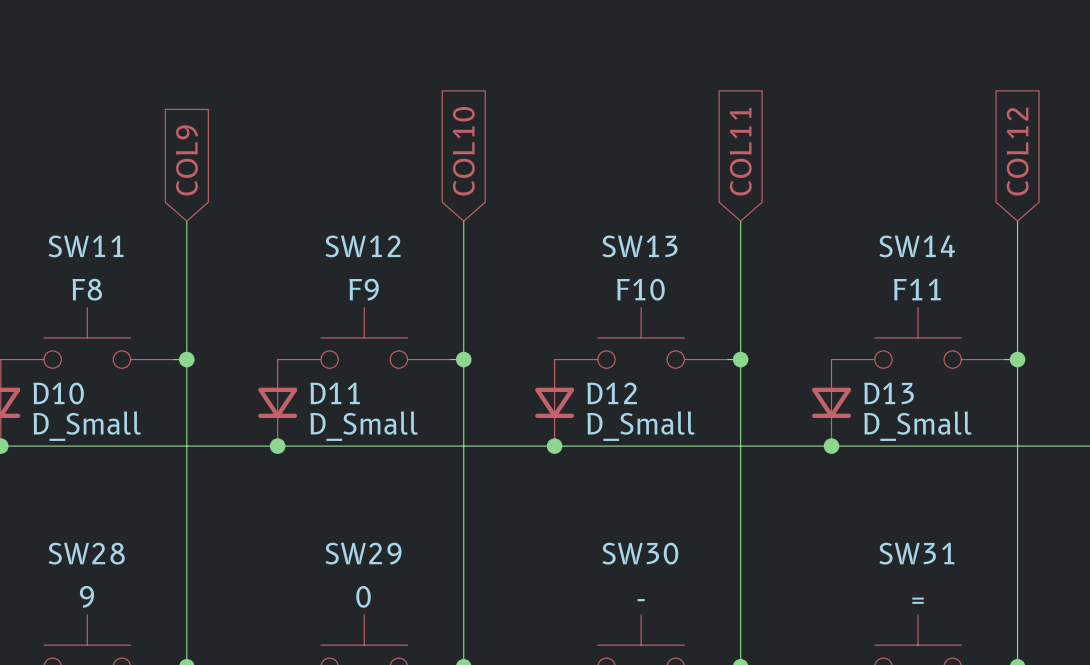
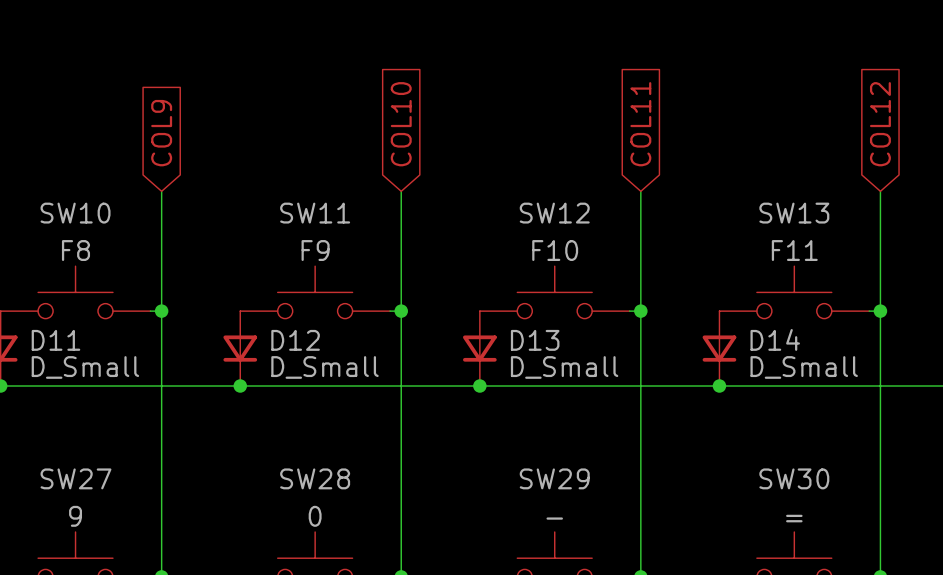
SW11 name: SW11 (86, 246) -> SW10 (75, 213)
SW12 name: SW12 (363, 246) -> SW11 (315, 213)
SW13 name: SW13 (639, 246) -> SW12 (554, 213)
SW14 name: SW14 (917, 246) -> SW13 (794, 213)
D10 name: D10 (58, 393) -> D11 (55, 340)
D11 name: D11 (335, 393) -> D12 (295, 340)
D12 name: D12 (612, 393) -> D13 (535, 340)
D13 name: D13 (889, 393) -> D14 (775, 339)
SW28 name: SW28 (86, 553) -> SW27 (75, 478)
SW29 name: SW29 (363, 553) -> SW28 (315, 478)
SW30 name: SW30 (640, 553) -> SW29 (554, 478)
SW31 name: SW31 (916, 553) -> SW30 (794, 478)

